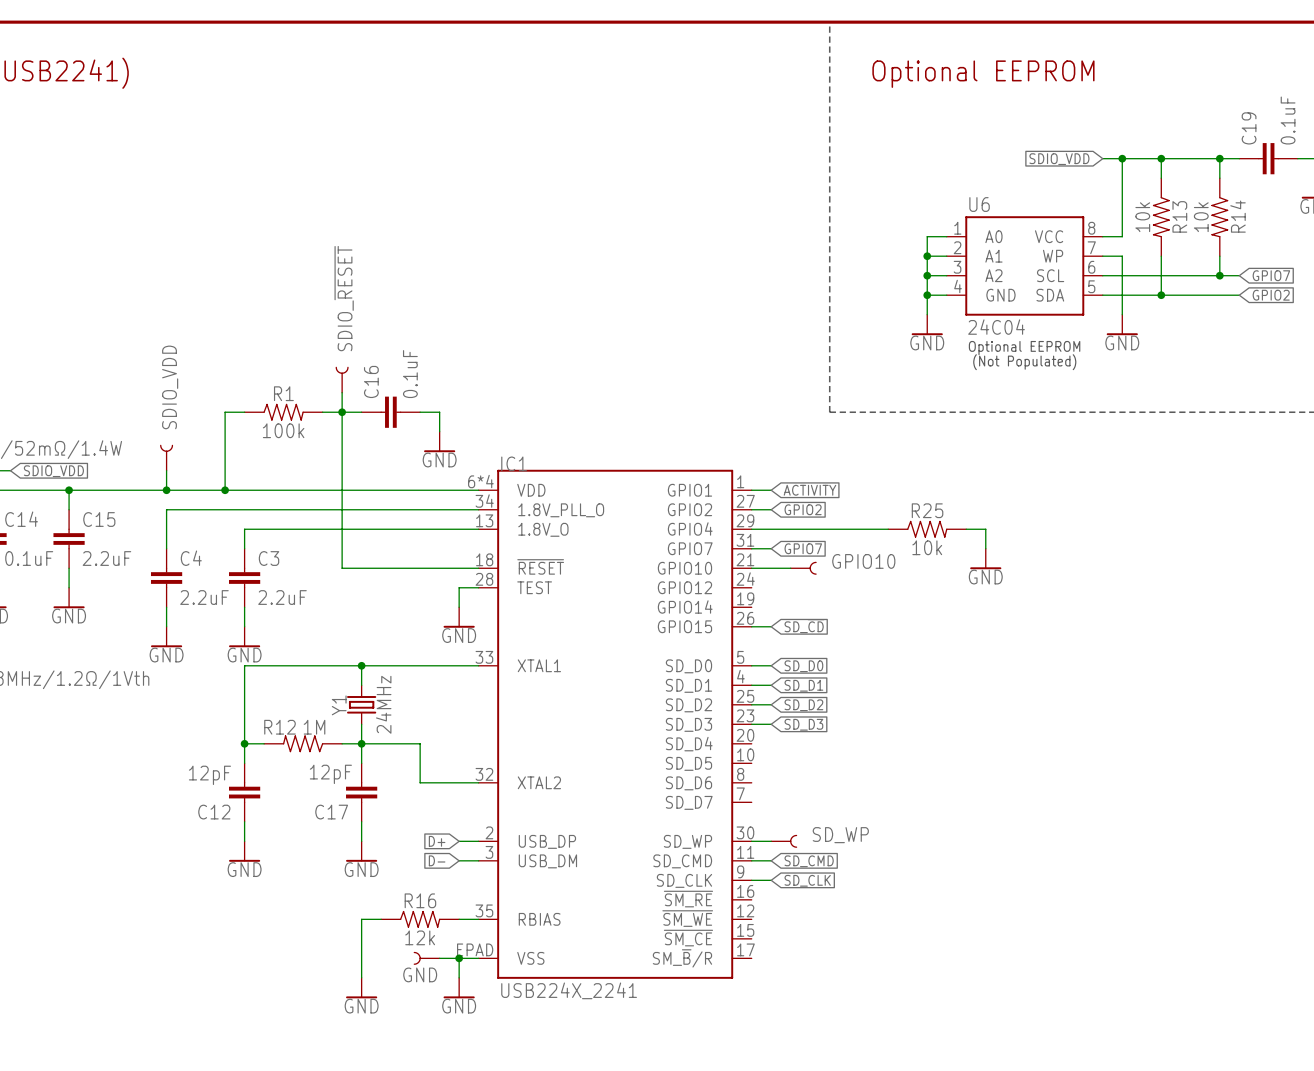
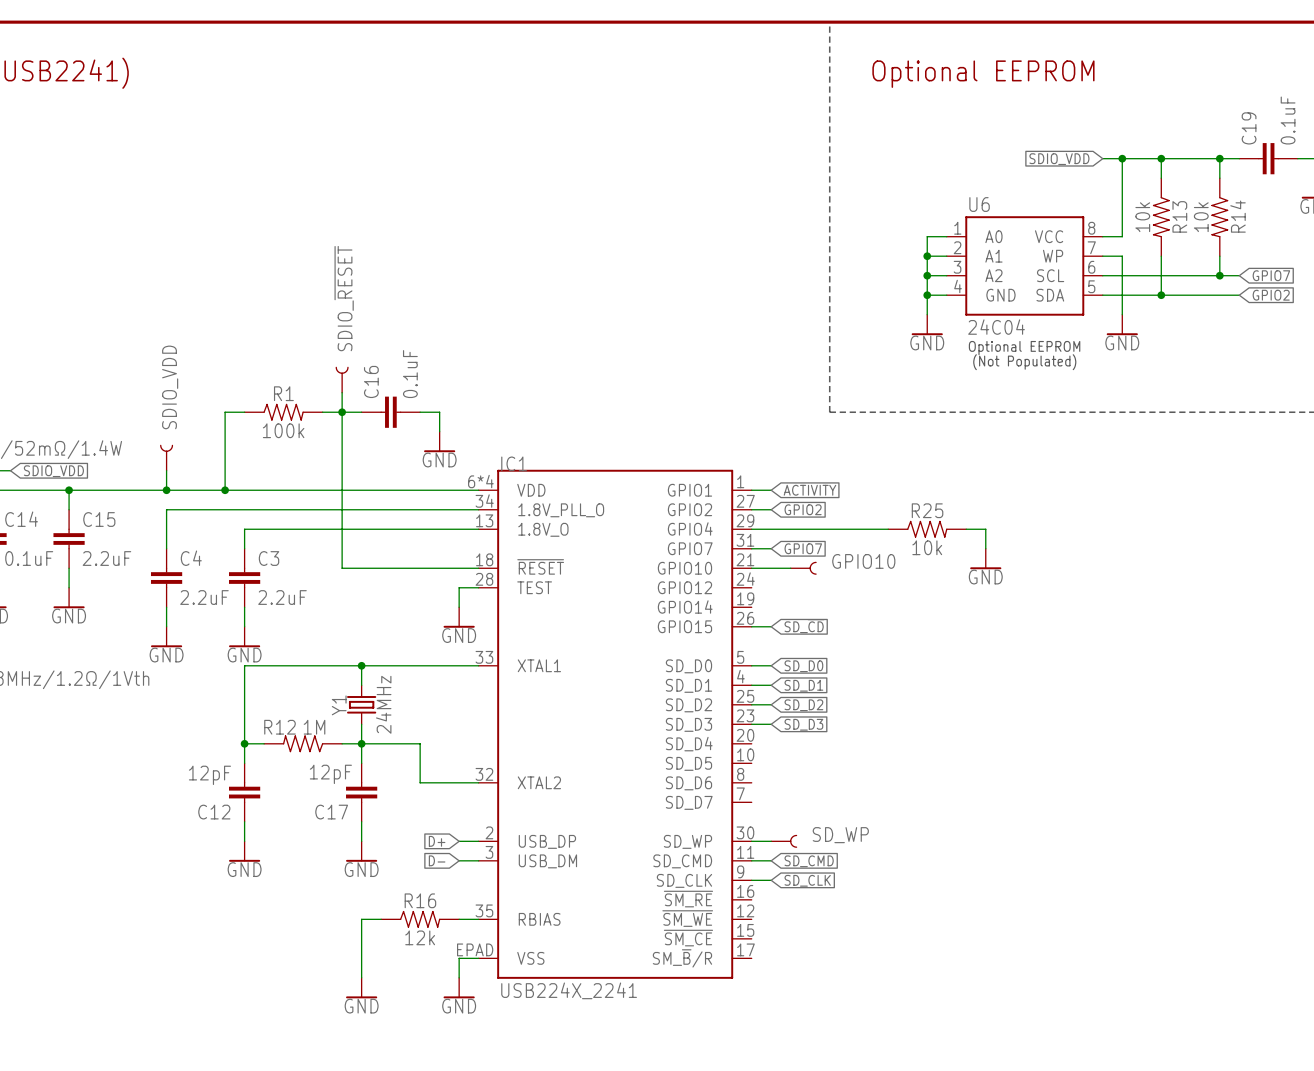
GND: (426, 958) -> none
wire: (439, 958) (459, 958) -> none
junction: (459, 958) -> none

